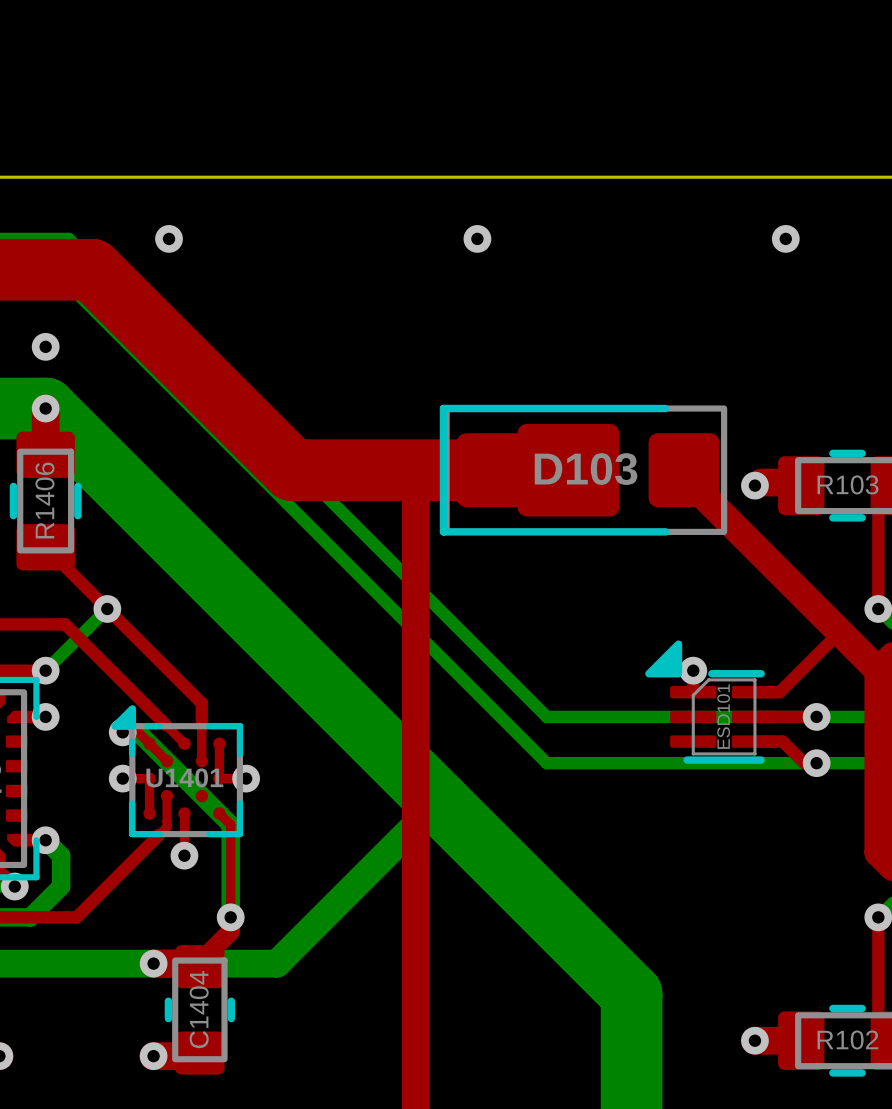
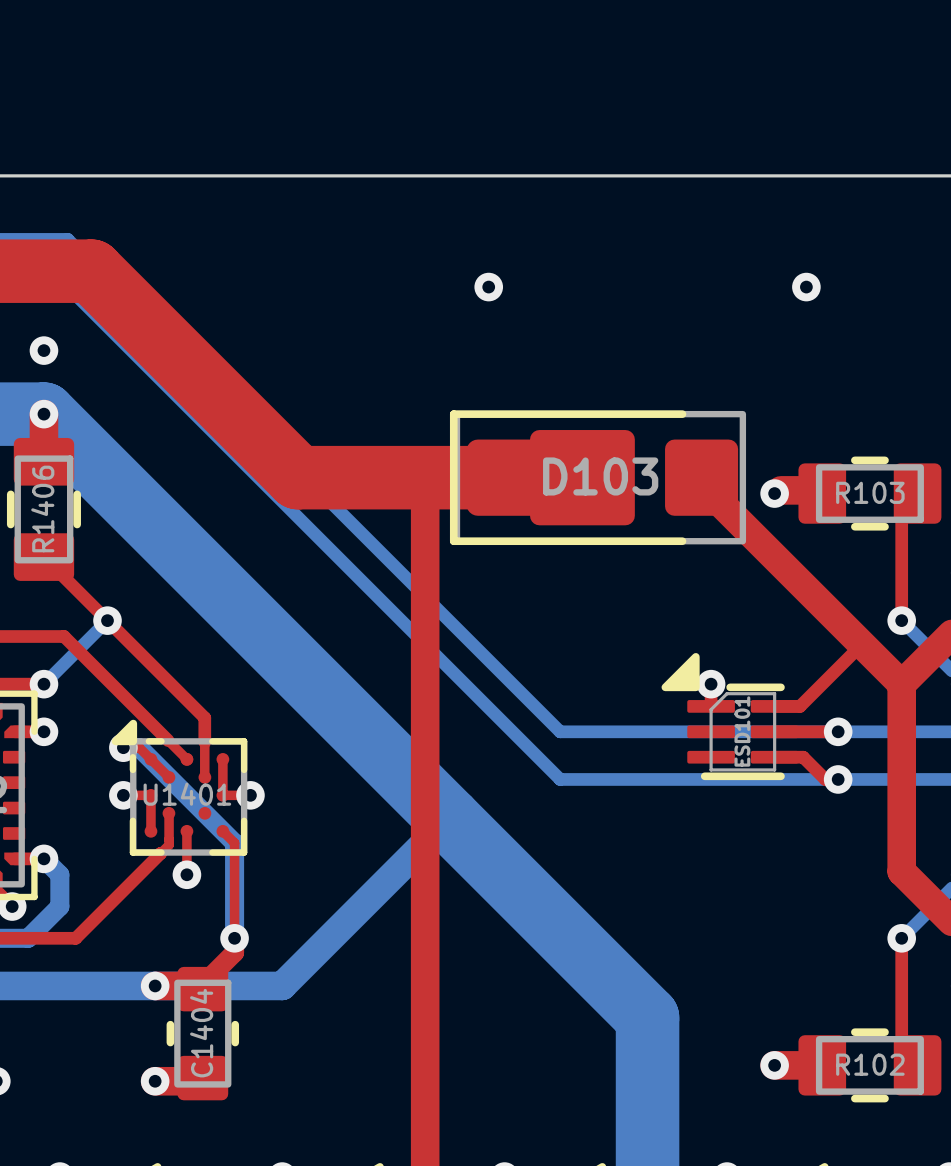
via: (169, 238) -> none
via position: (477, 238) -> (488, 287)
via position: (785, 238) -> (806, 287)

